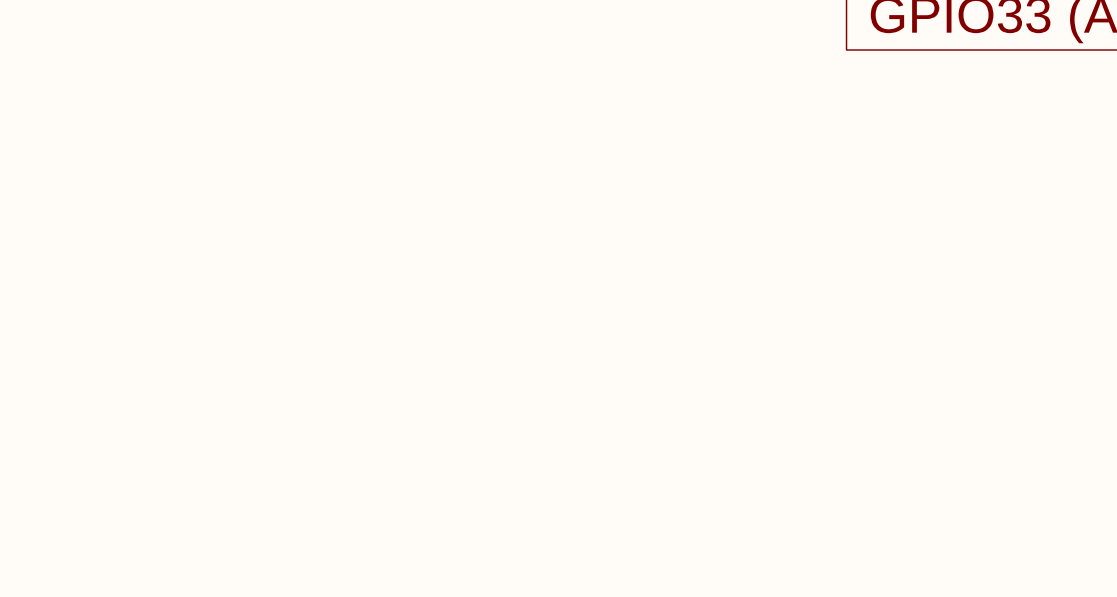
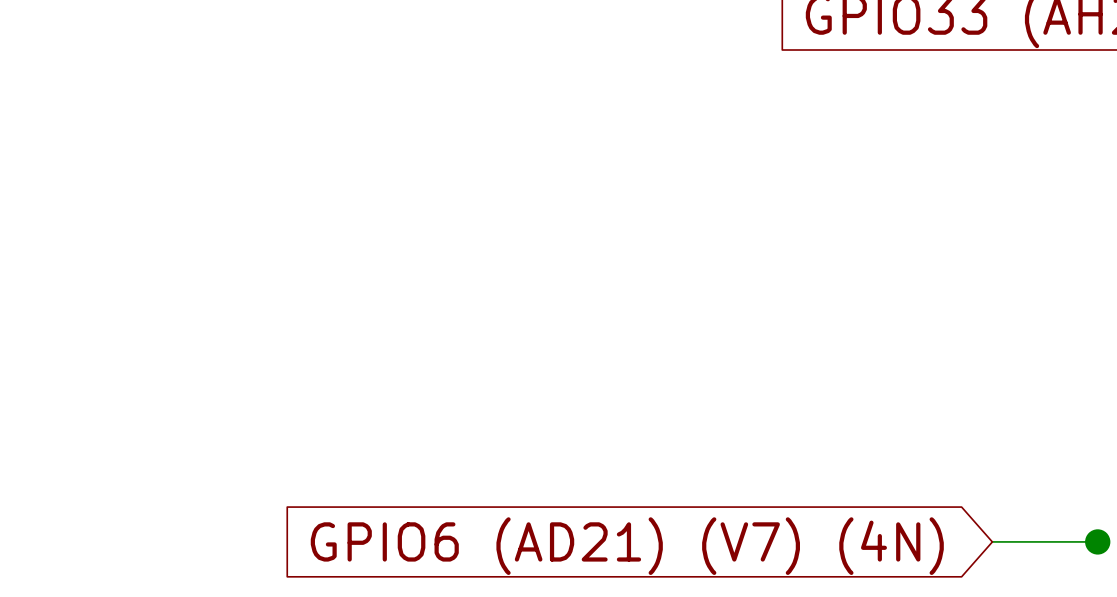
wire: none -> (992, 541) (1097, 541)
junction: none -> (1097, 541)
global label: none -> GPIO6 (AD21) (V7) (4N) (627, 546)

